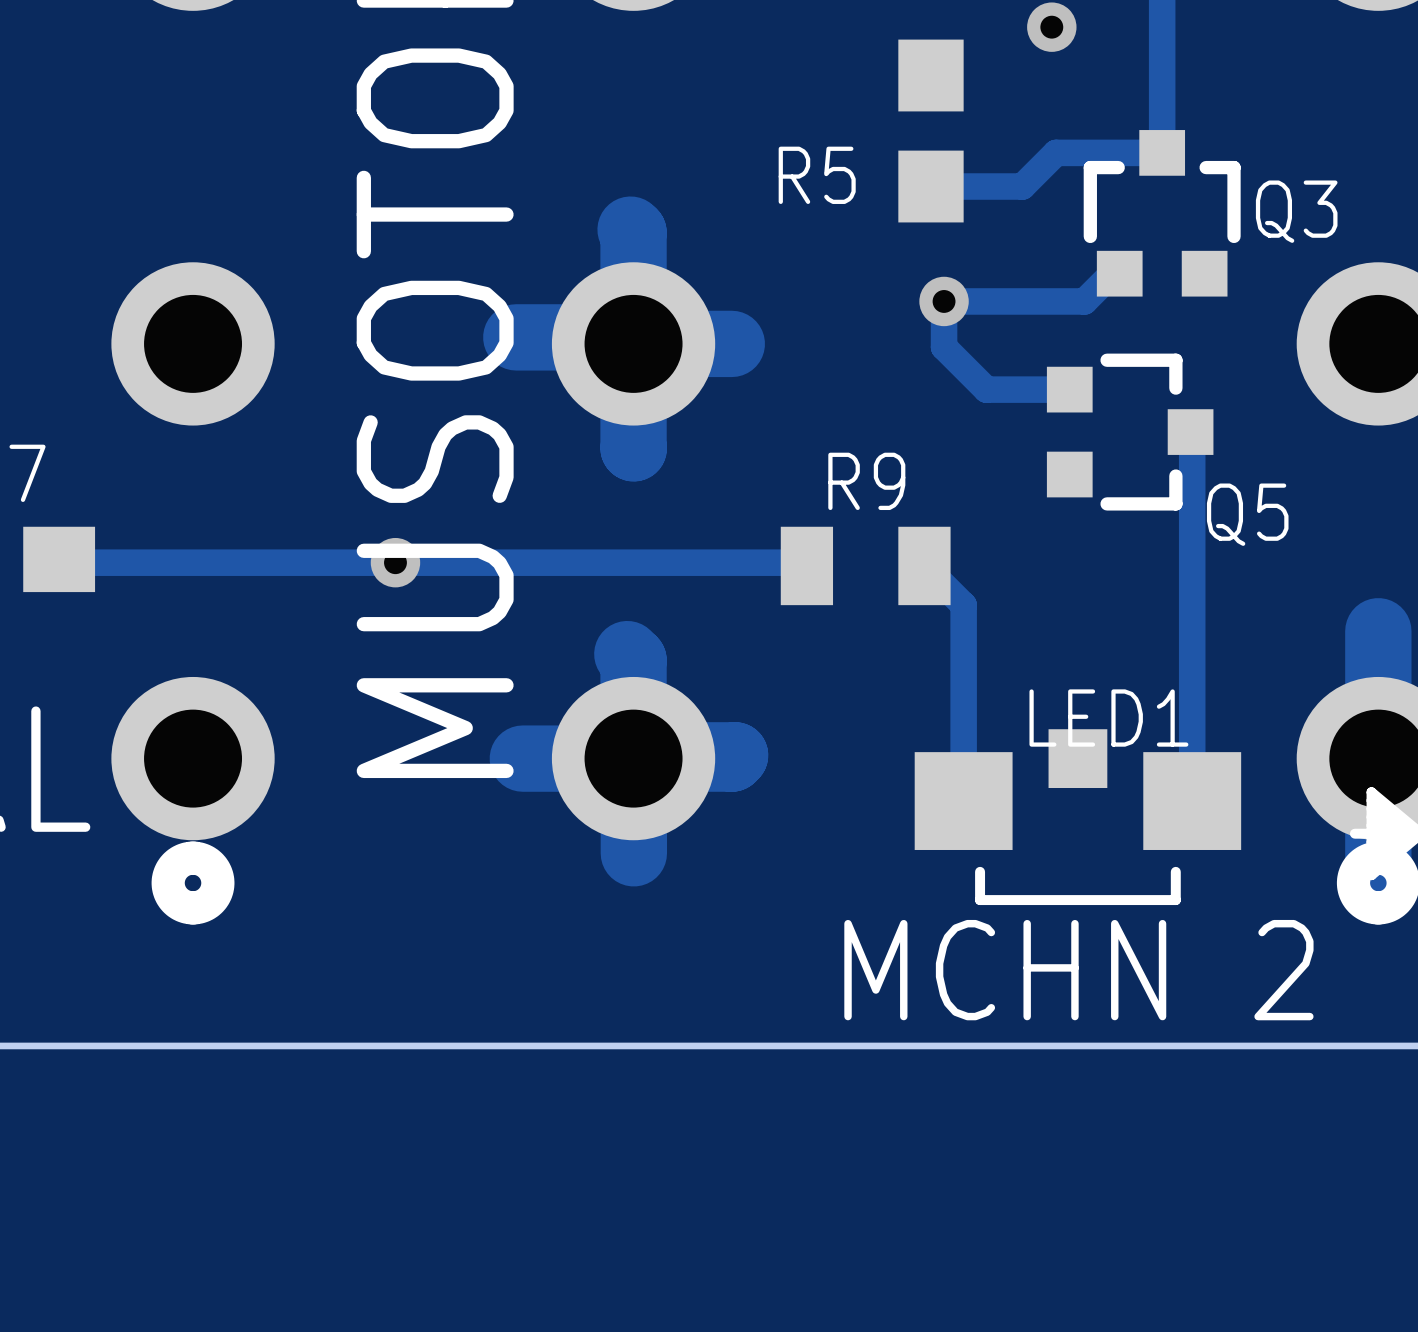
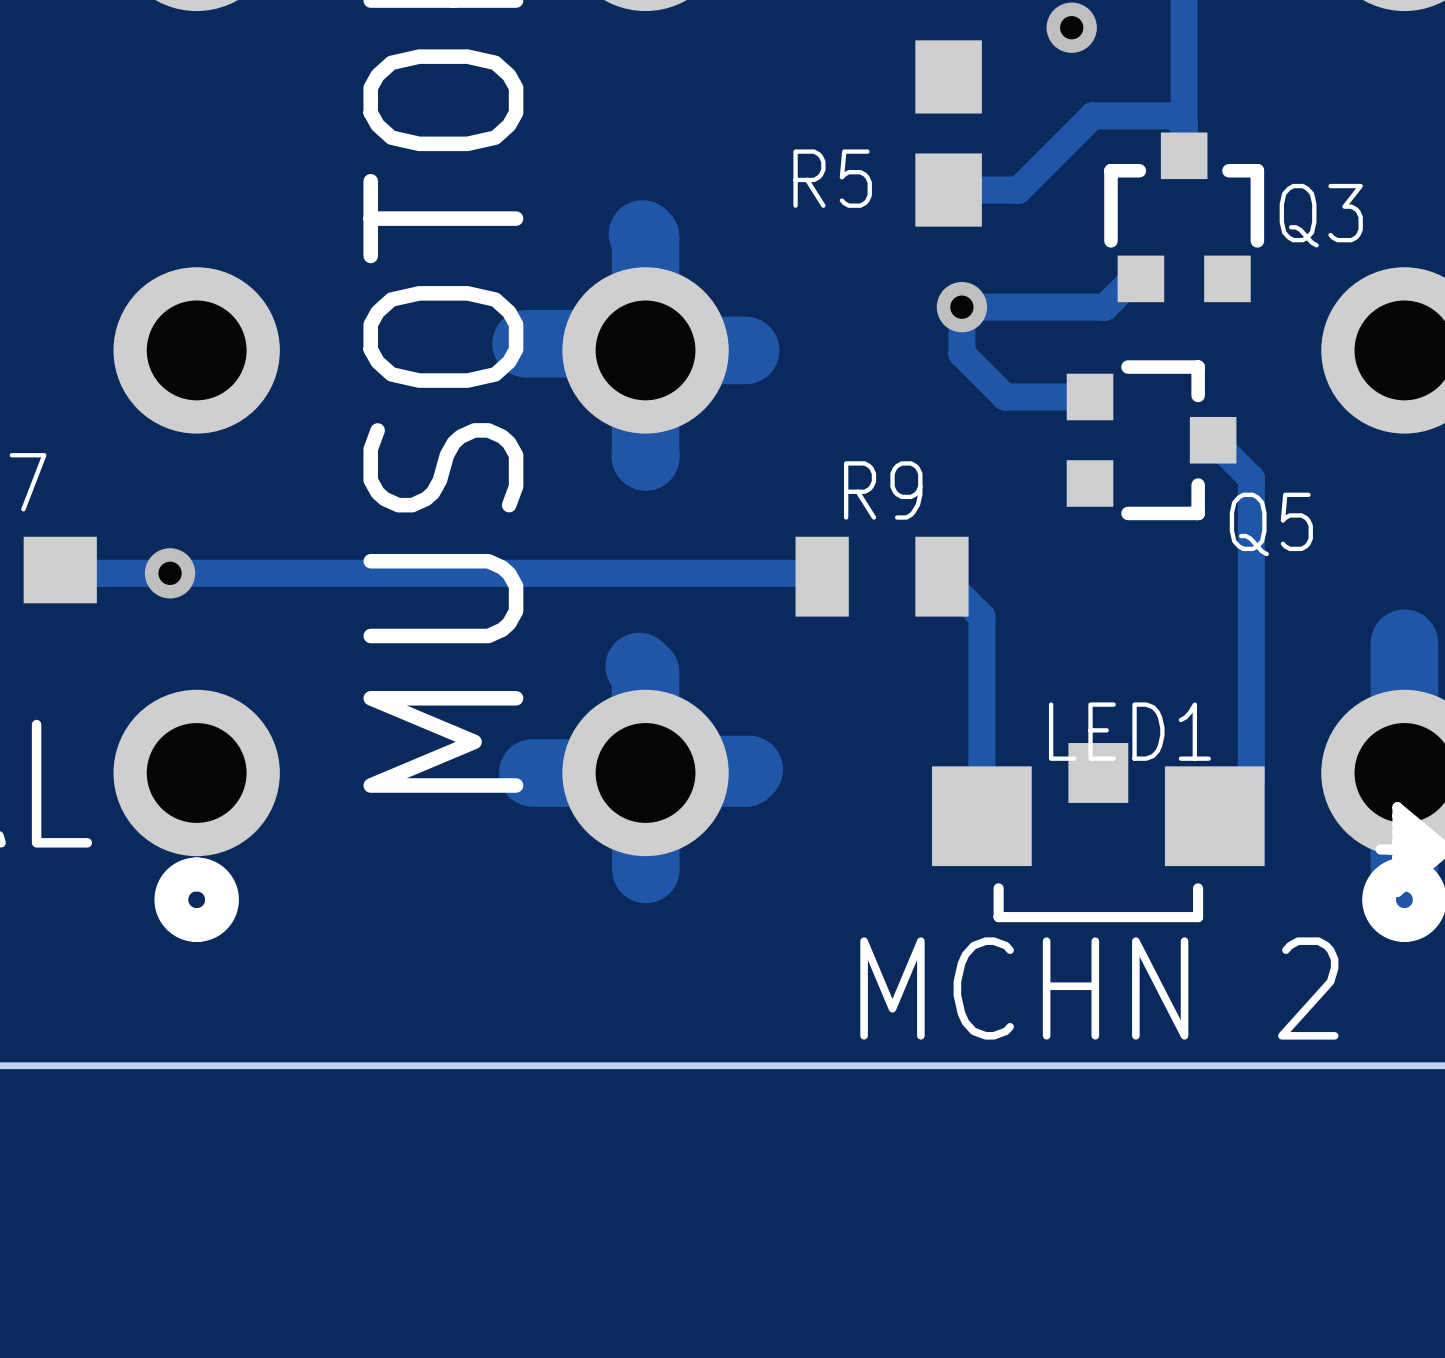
track: (1162, 152) (1056, 152) (1022, 186) (999, 186) -> (1184, 125) (1174, 115) (1092, 115) (1018, 190)
track: (1192, 433) (1192, 801) -> (1214, 441) (1251, 478) (1251, 779) (1214, 816)
via position: (395, 562) -> (170, 573)

